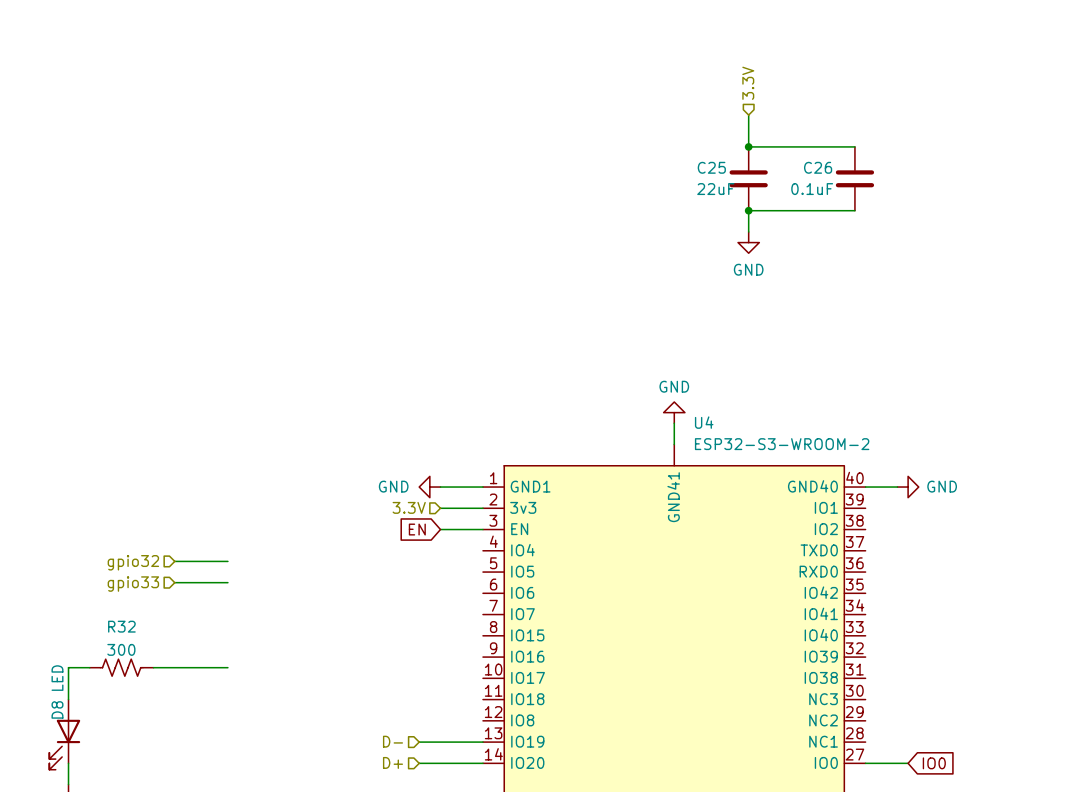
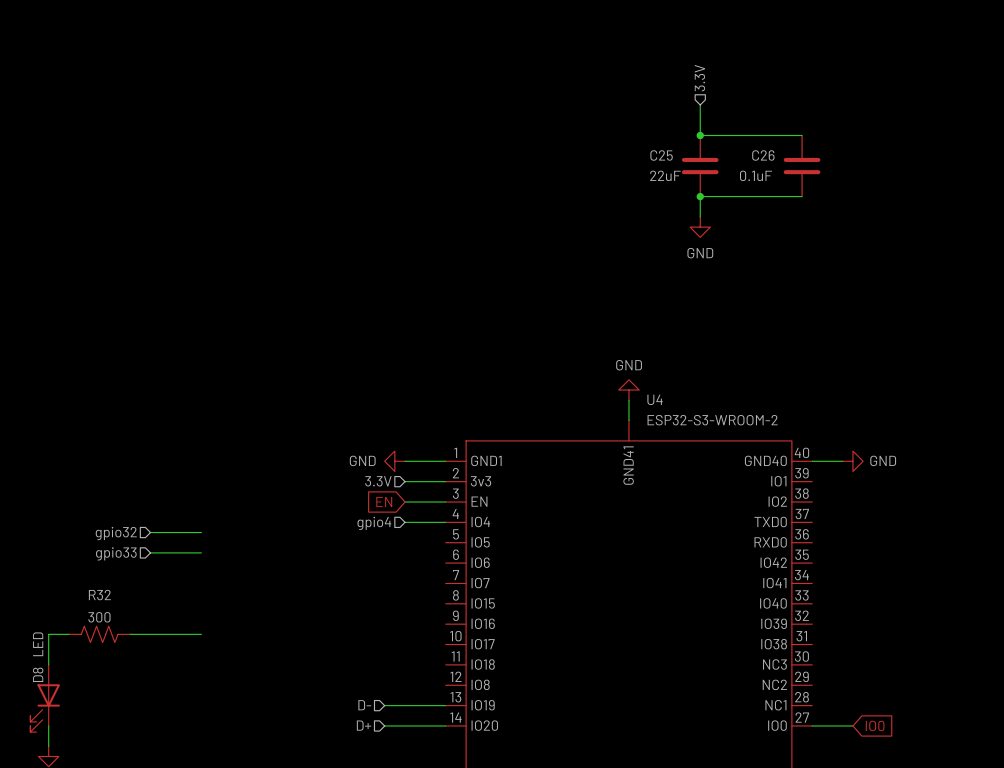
wire: none -> (405, 522) (445, 522)
hierarchical label: none -> gpio4 (374, 523)

